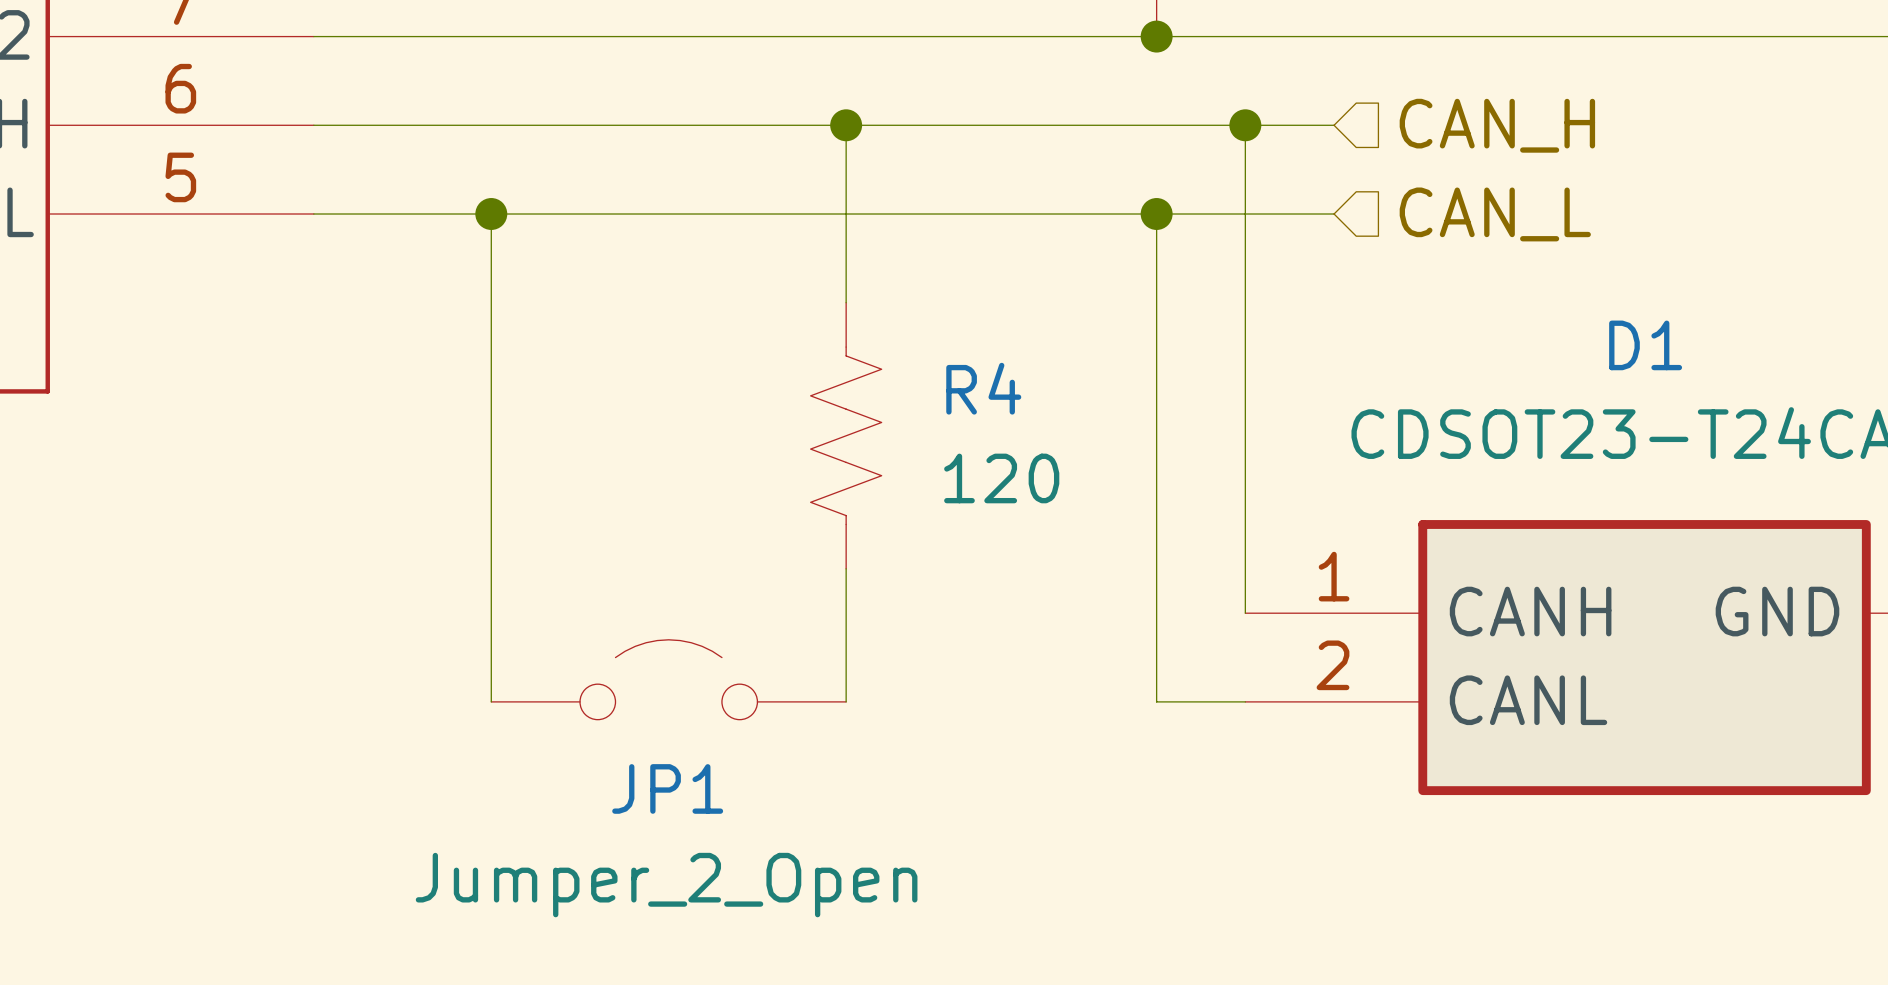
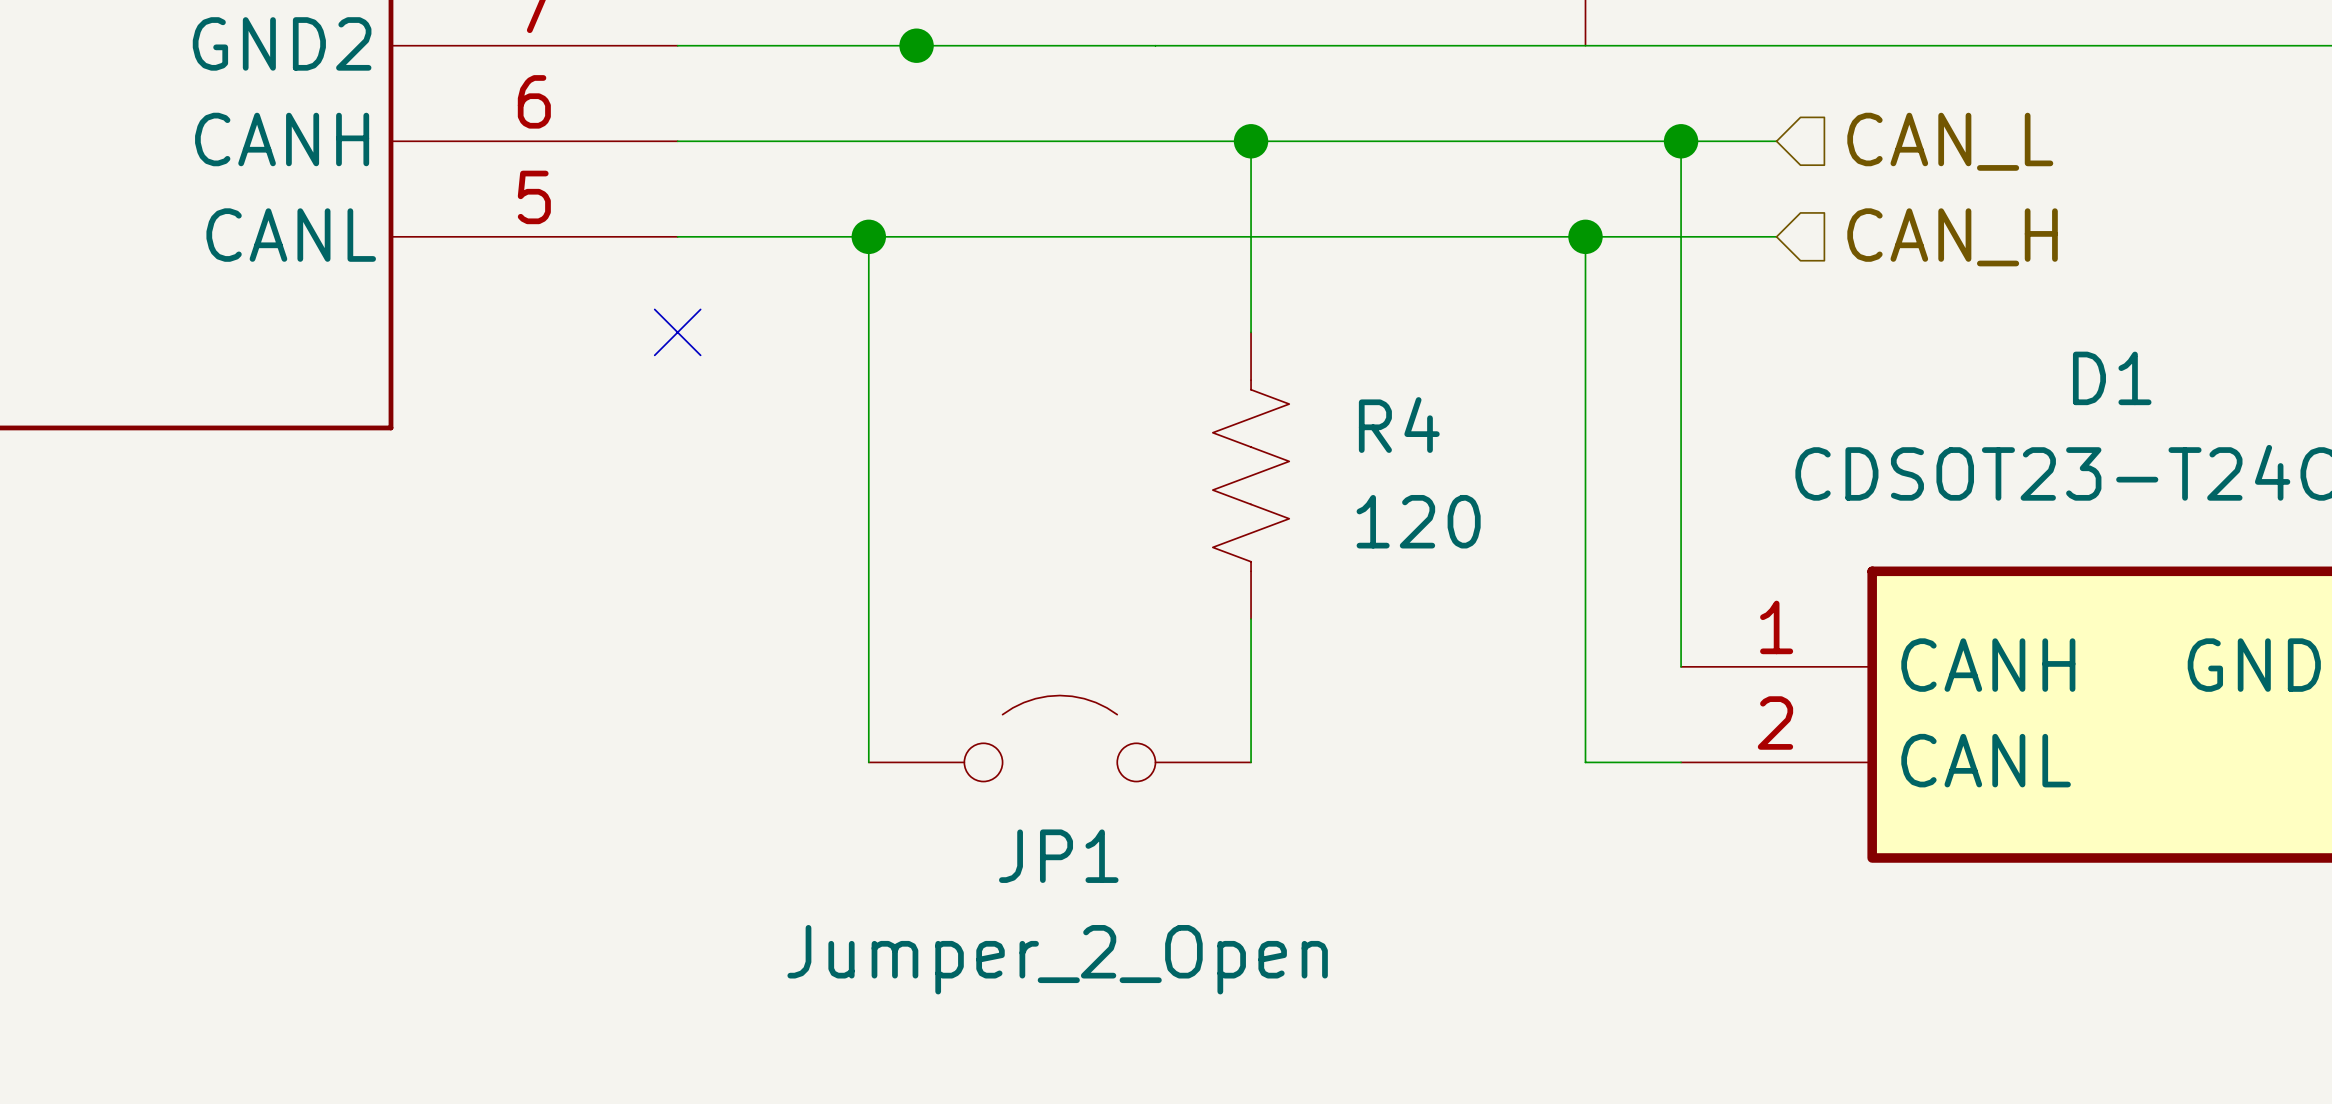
junction: none -> (916, 45)
junction: (1156, 36) -> none
hierarchical label: CAN_H (1497, 125) -> CAN_L (1950, 141)
hierarchical label: CAN_L (1495, 214) -> CAN_H (1952, 237)
no-connect mark: none -> (677, 332)

